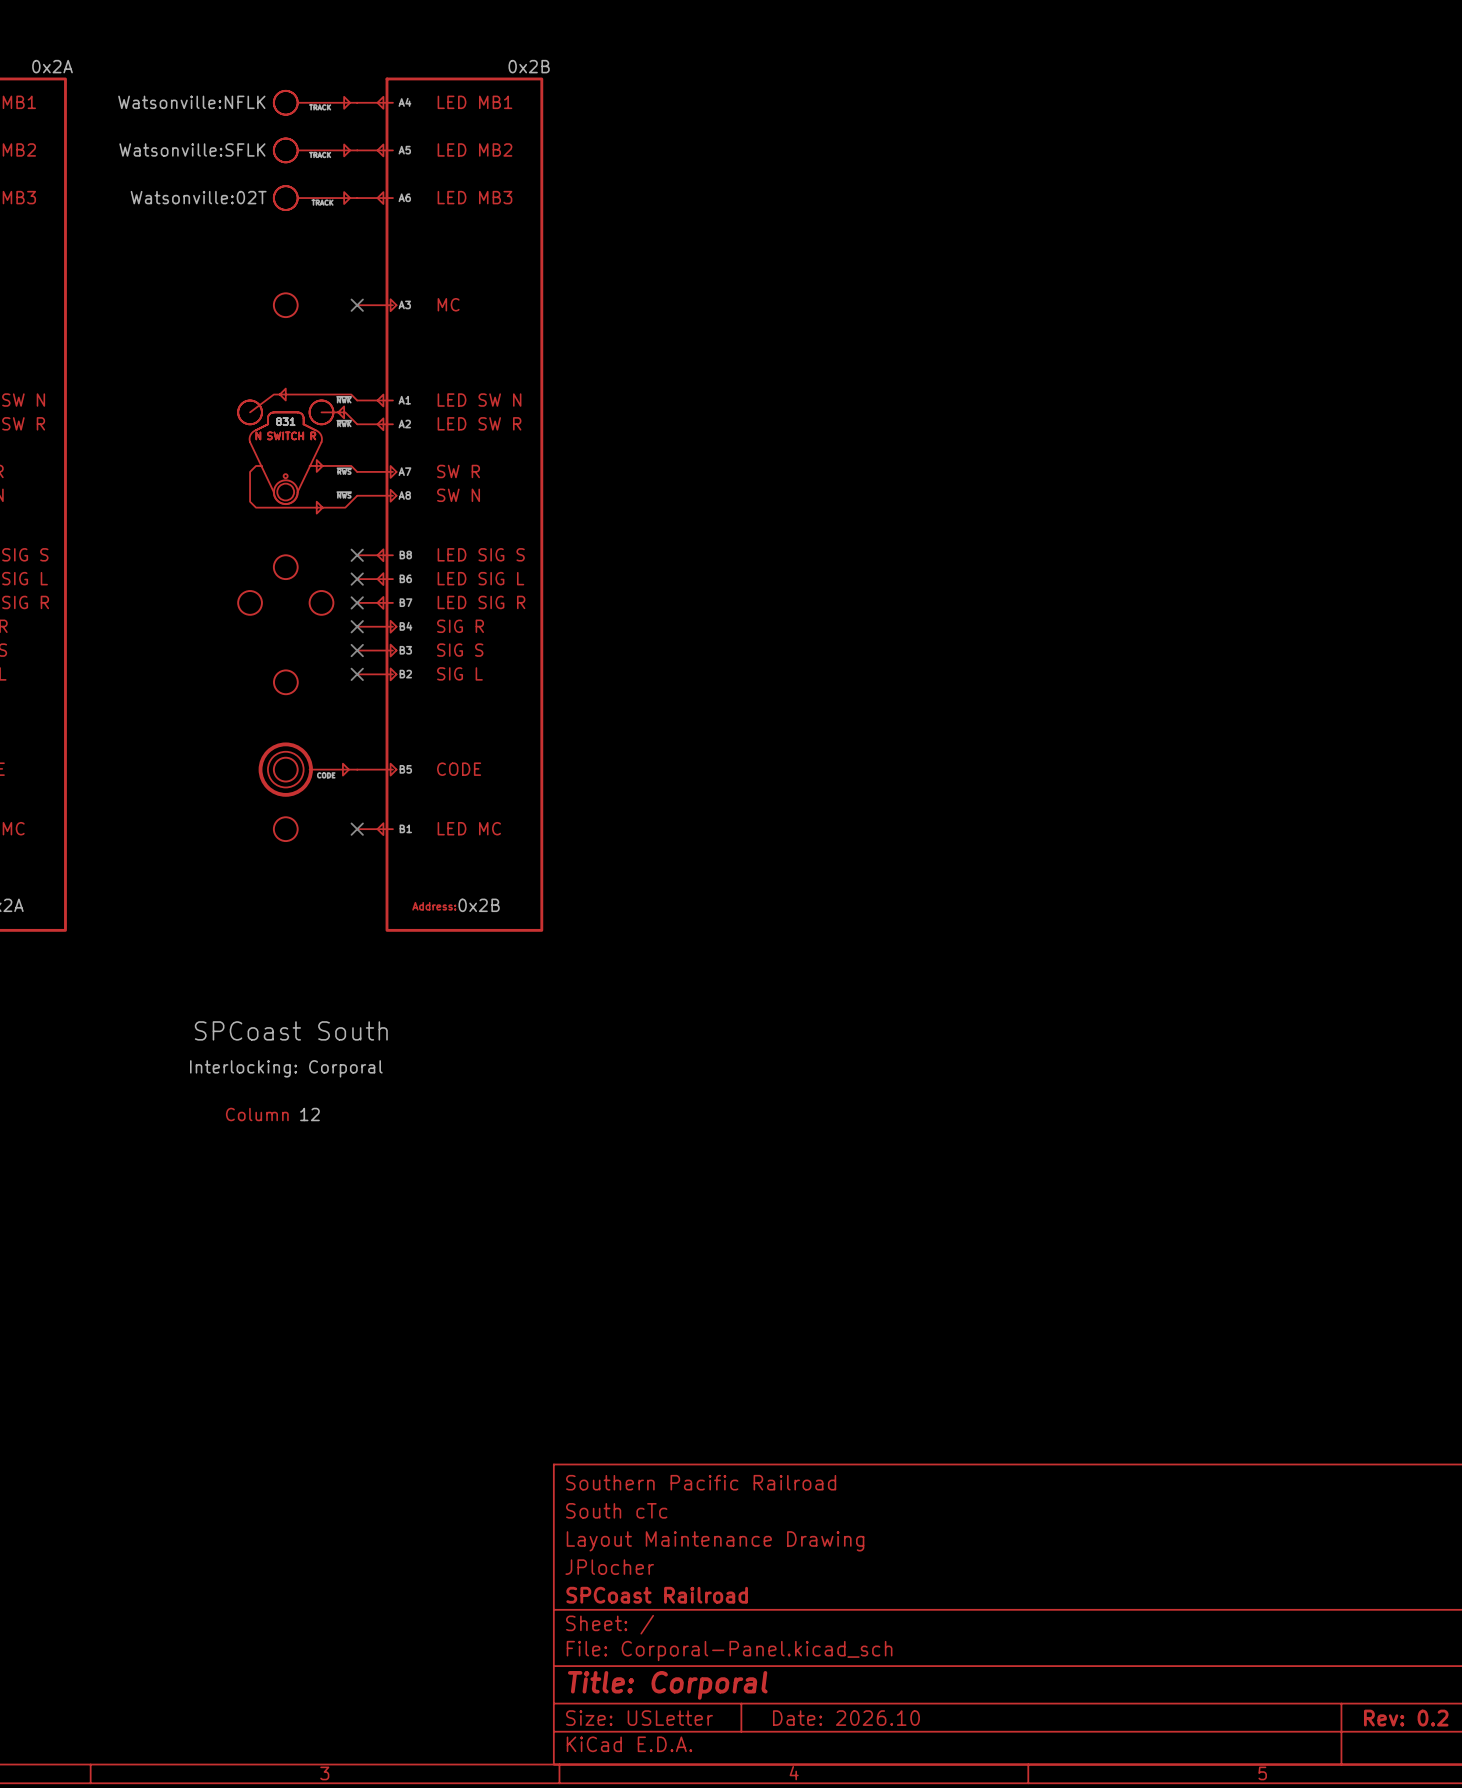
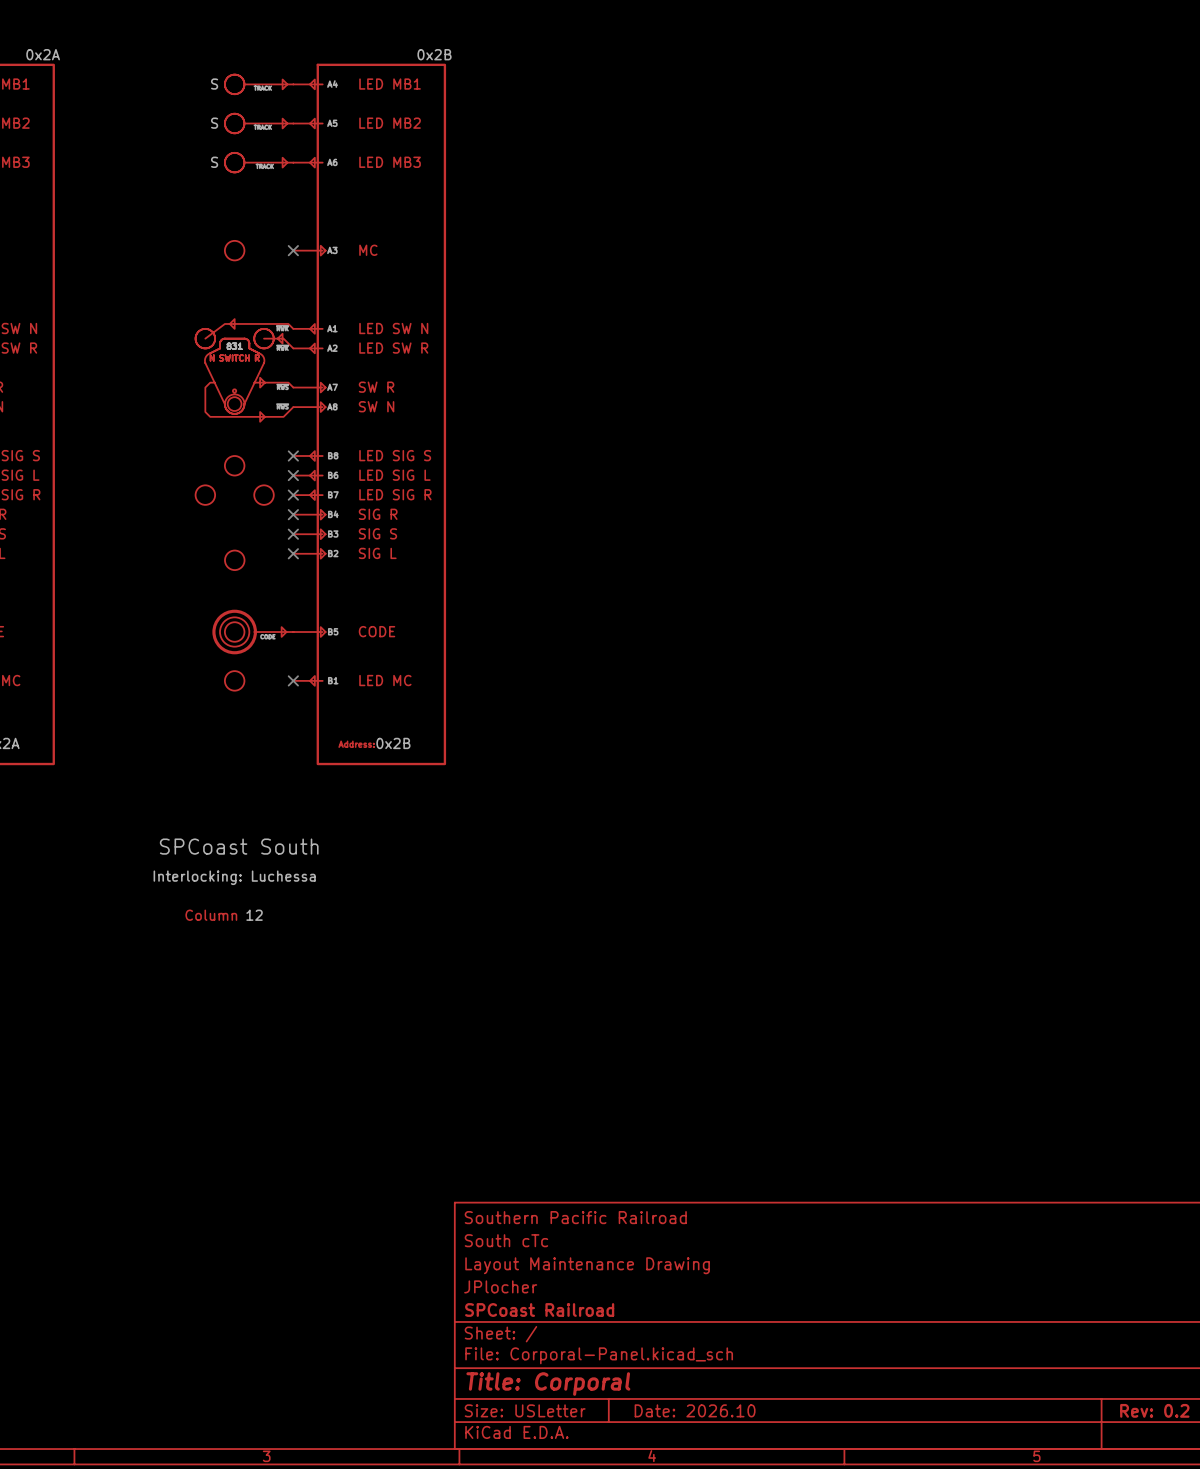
part text: Watsonville:NFLK (191, 102) -> S (214, 84)
part text: Watsonville:SFLK (192, 149) -> S (214, 123)
part text: Watsonville:02T (198, 197) -> S (214, 162)
part text: Interlocking: Corporal (286, 1068) -> Interlocking: Luchessa (234, 877)

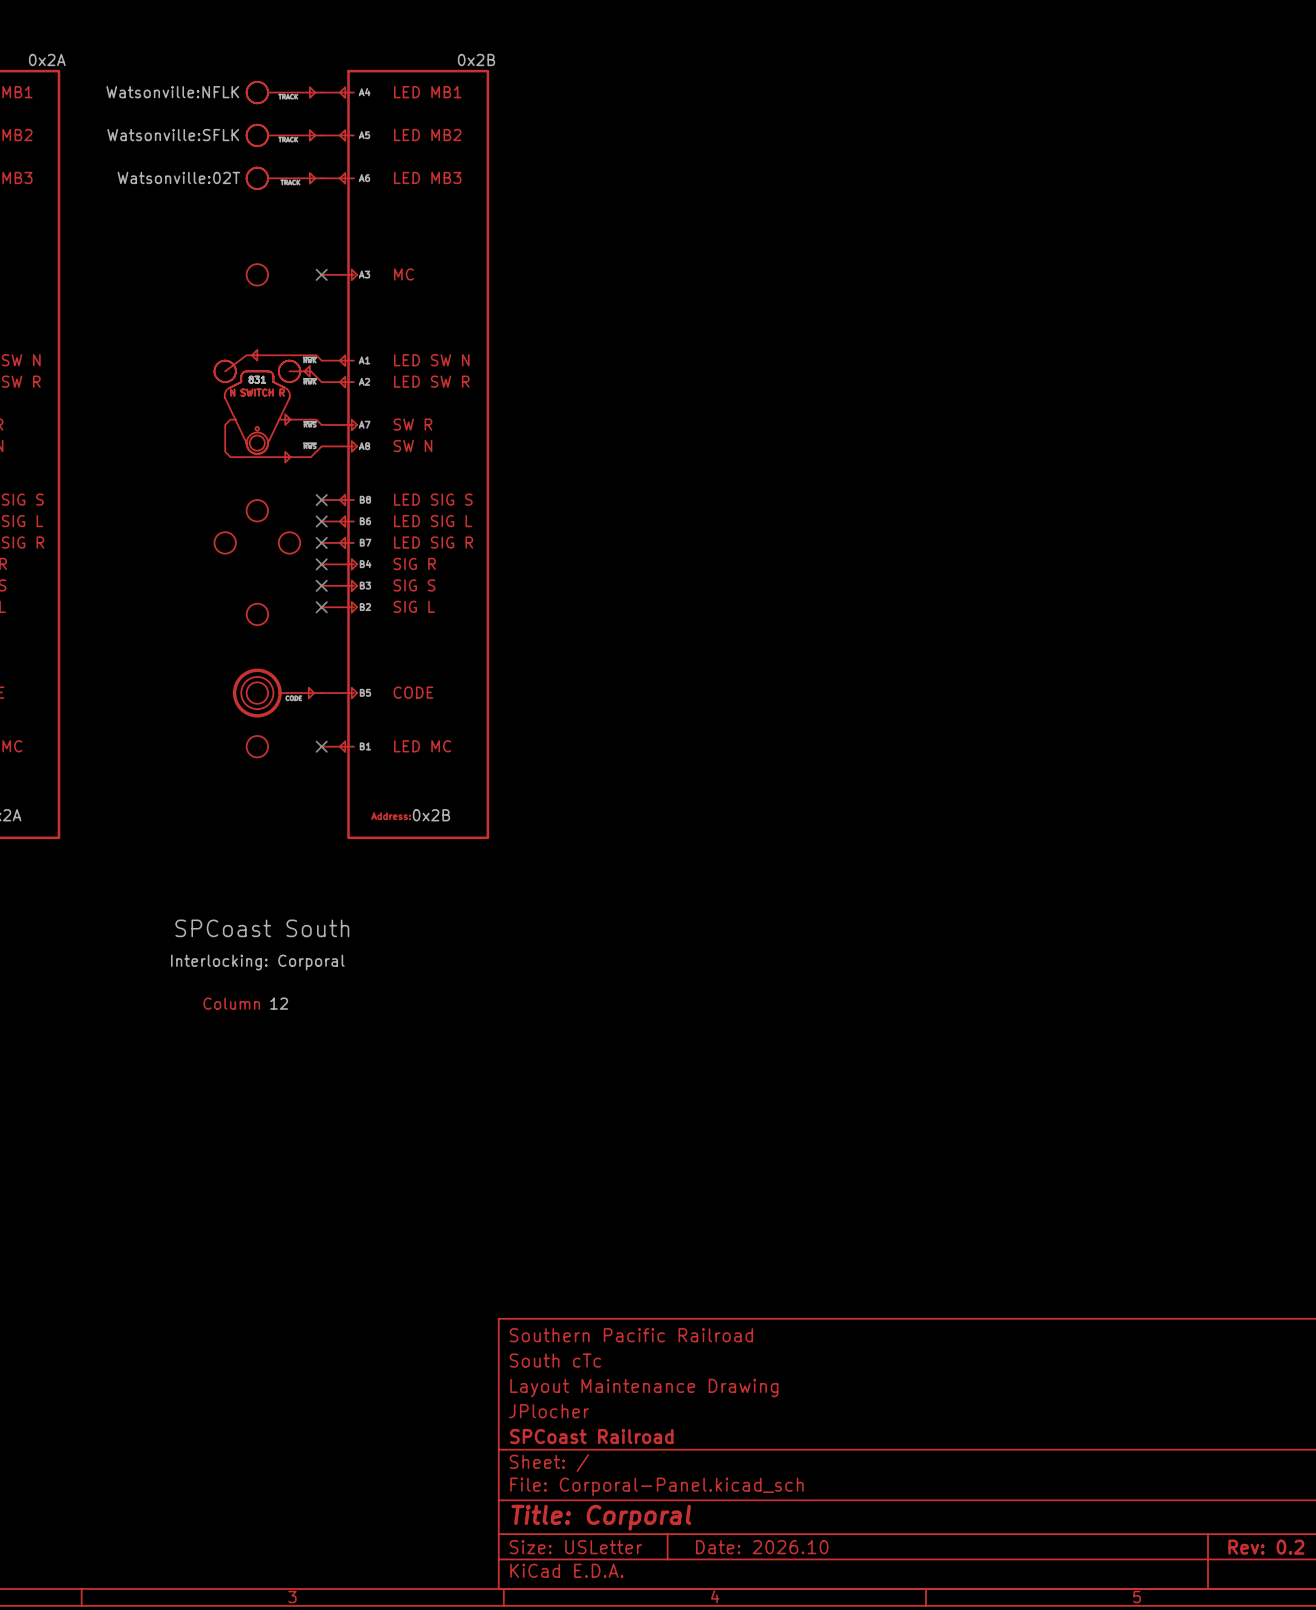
part text: S (214, 84) -> Watsonville:NFLK (172, 92)
part text: S (214, 123) -> Watsonville:SFLK (173, 135)
part text: S (214, 162) -> Watsonville:02T (178, 177)
part text: Interlocking: Luchessa (234, 877) -> Interlocking: Corporal (257, 962)

